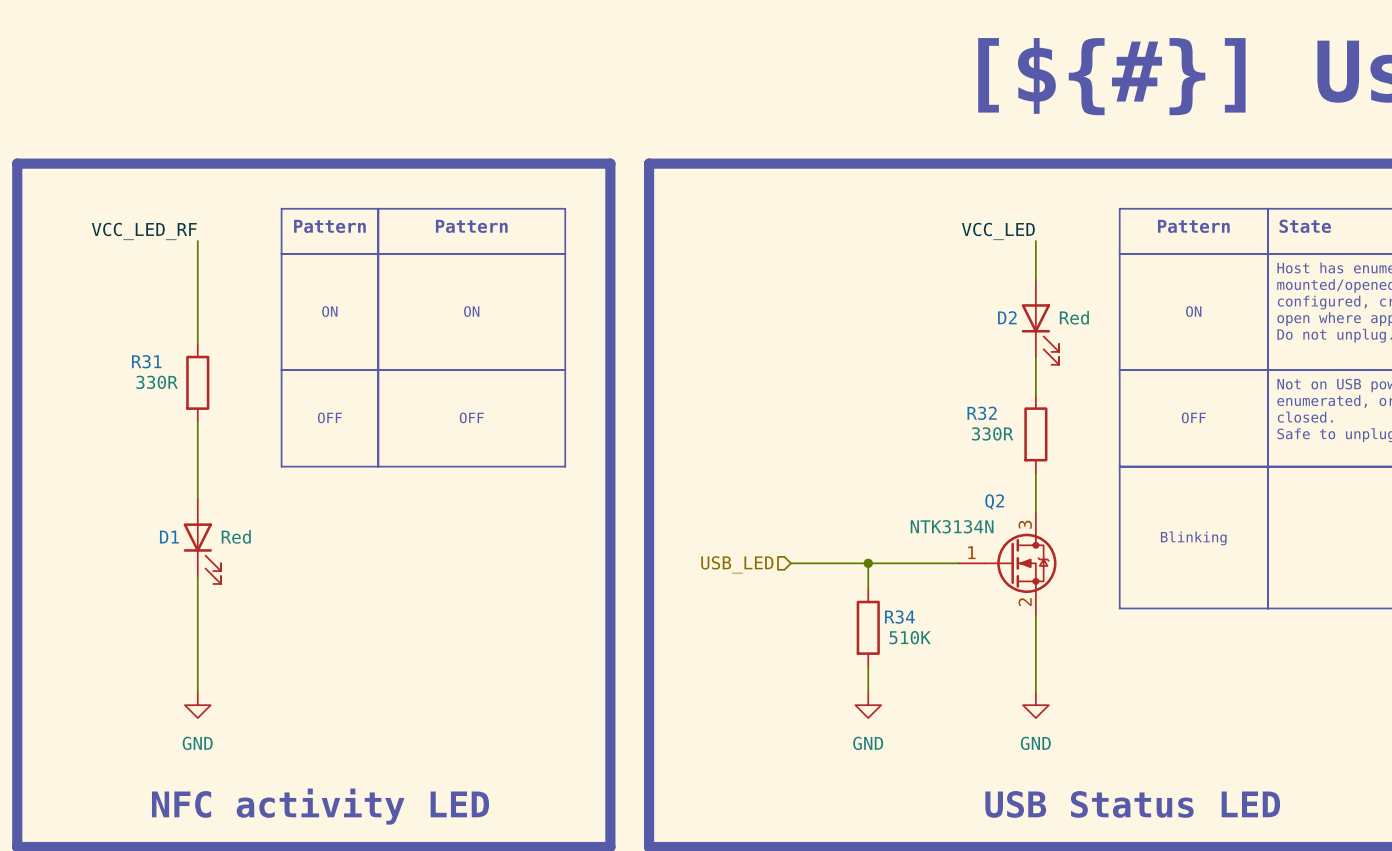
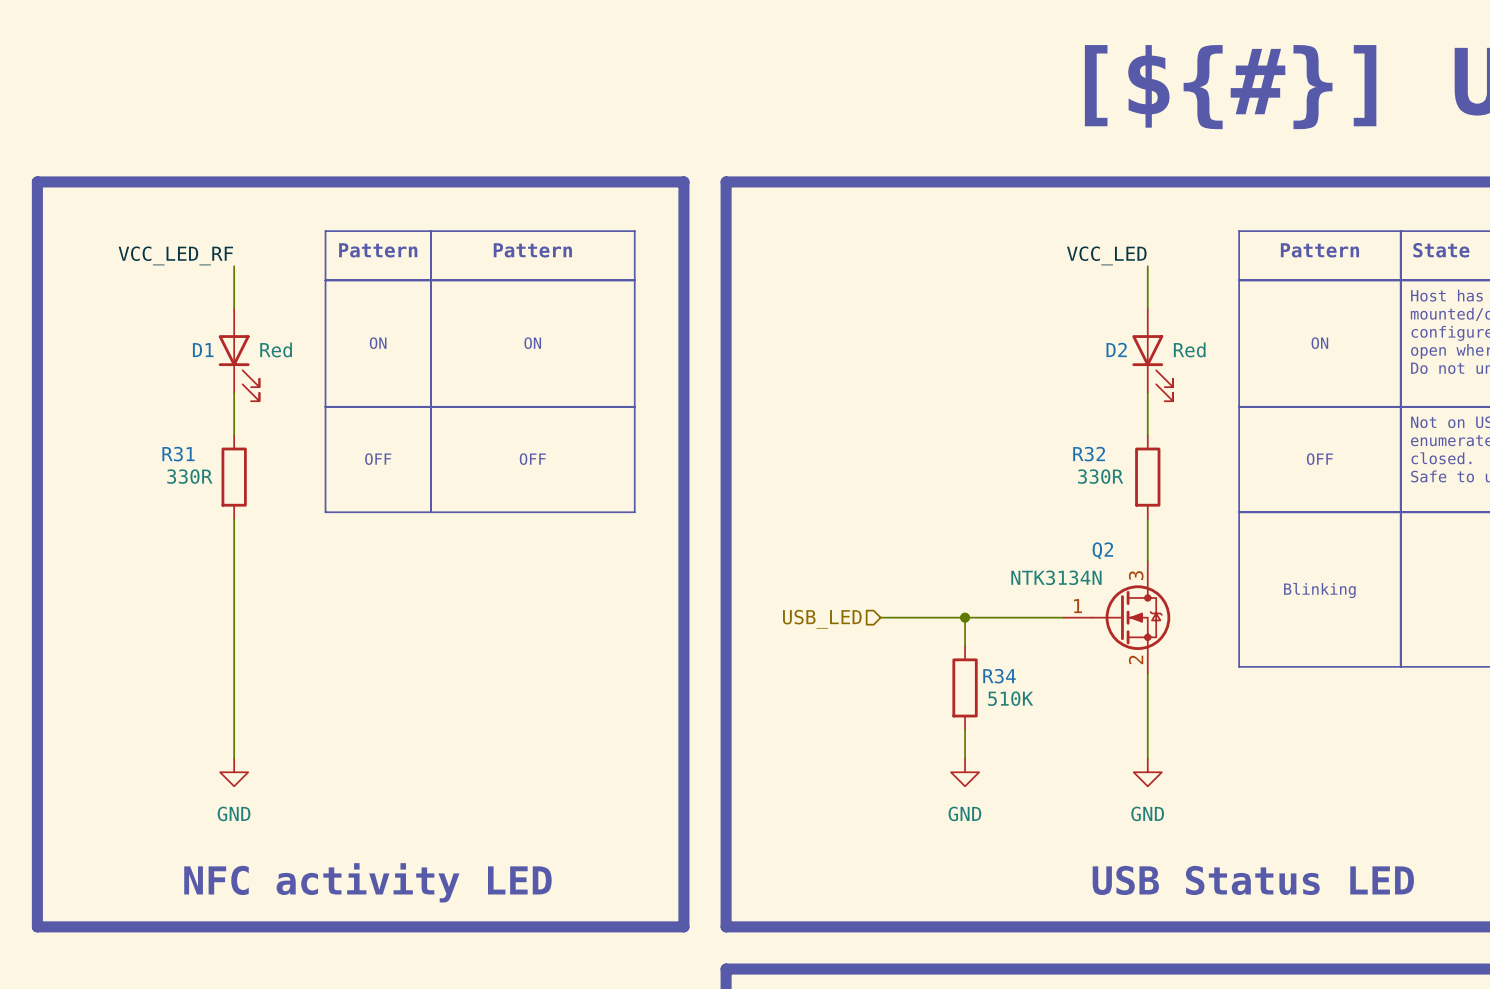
wire: none -> (234, 392) (234, 434)
R31 position: (197, 382) -> (234, 477)
wire: (197, 421) (197, 473) -> none
D1 position: (202, 541) -> (239, 354)

